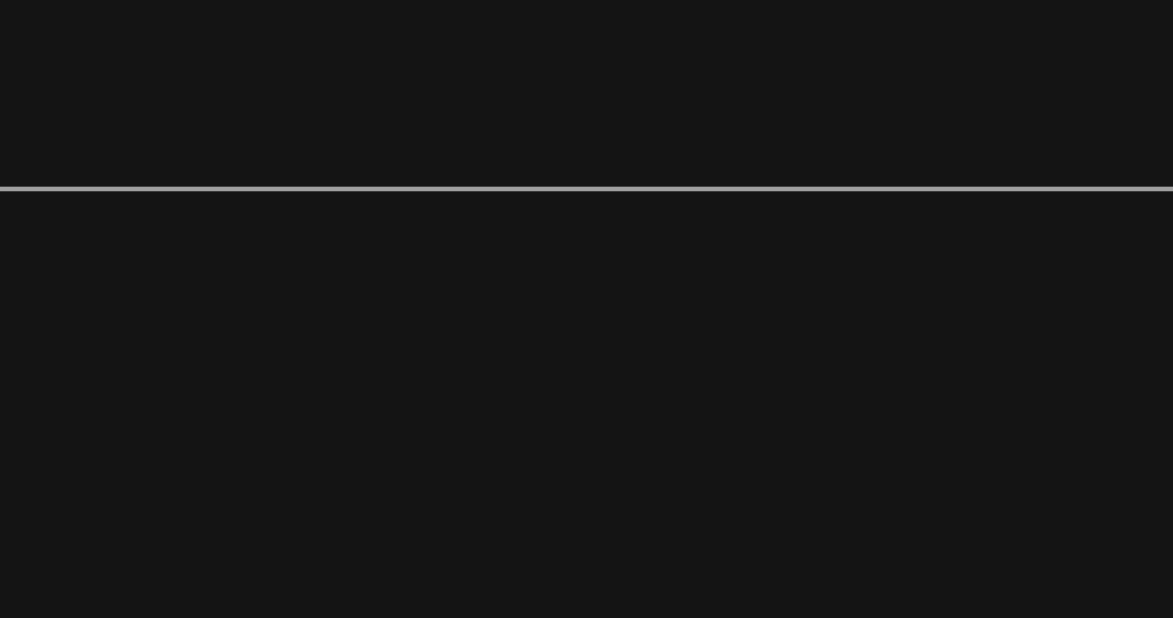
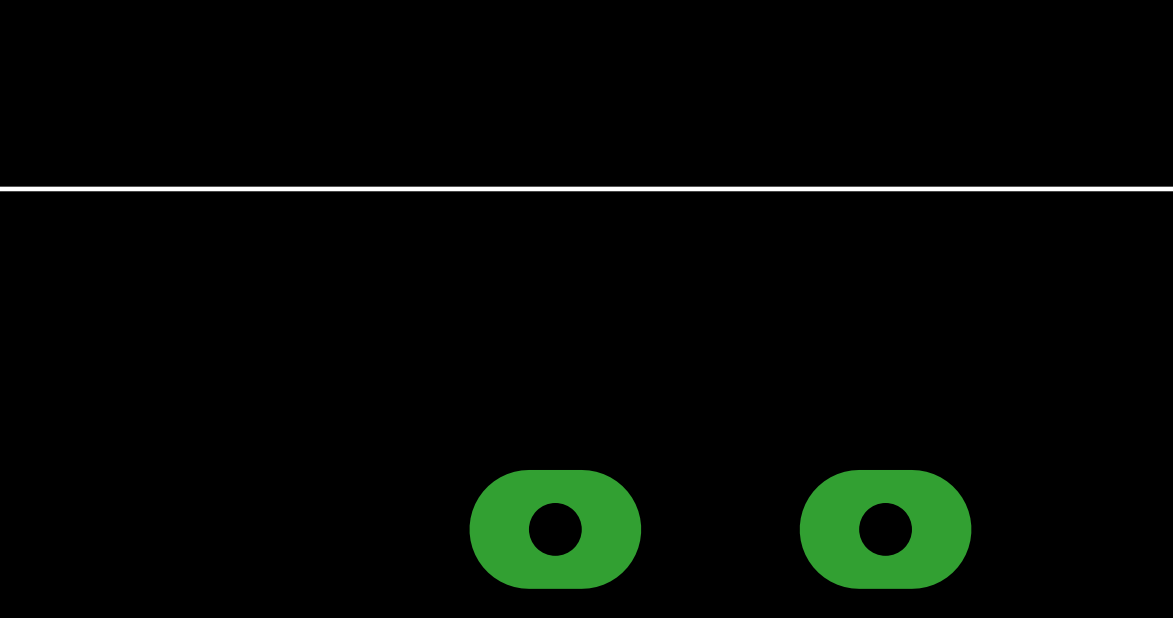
part: none -> (720, 529)

